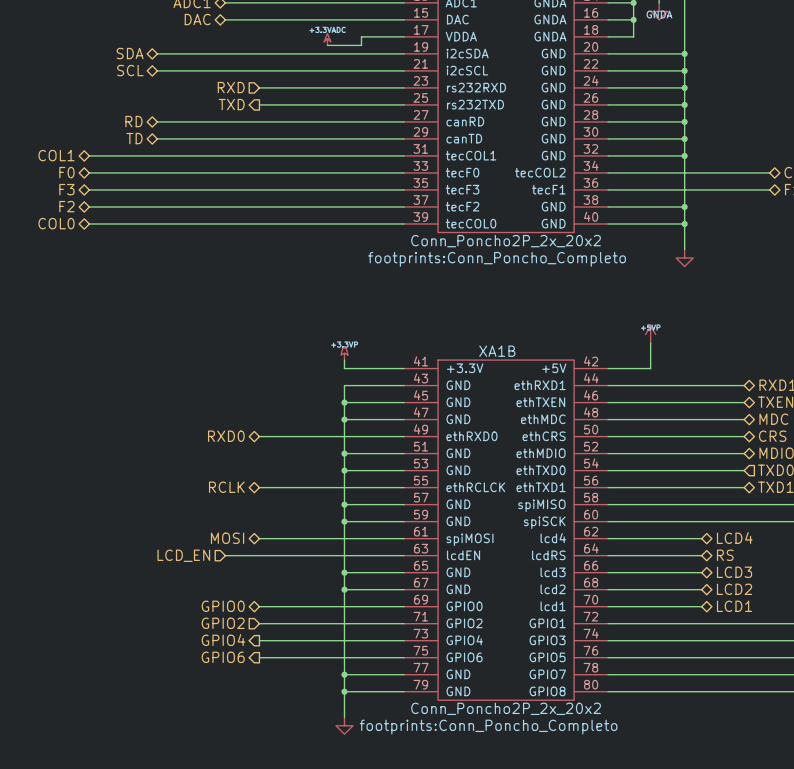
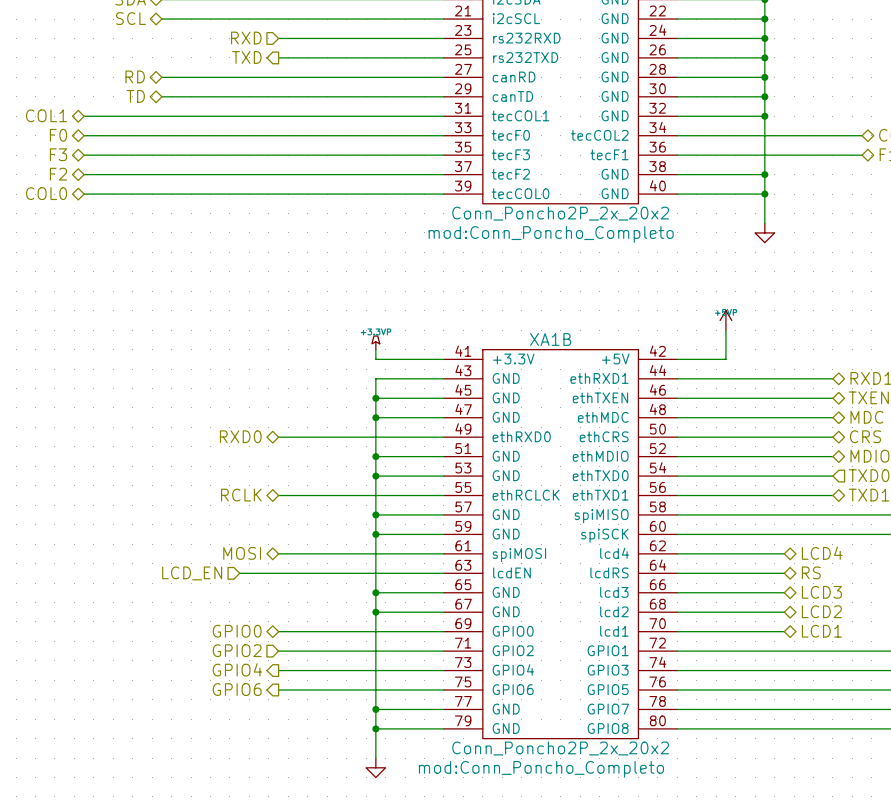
part text: footprints:Conn_Poncho_Completo (497, 259) -> mod:Conn_Poncho_Completo (551, 234)
XA1B text: footprints:Conn_Poncho_Completo (488, 727) -> mod:Conn_Poncho_Completo (541, 769)

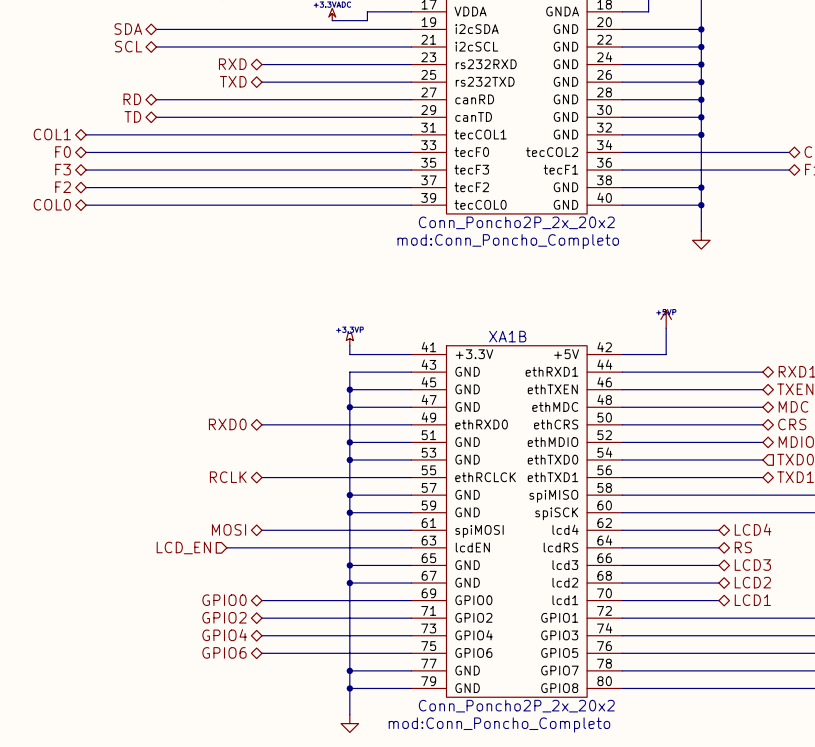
hierarchical label shape: input (246, 38) -> bidirectional (232, 64)
hierarchical label shape: output (246, 57) -> bidirectional (233, 81)
hierarchical label shape: input (237, 650) -> bidirectional (224, 617)
hierarchical label shape: output (237, 669) -> bidirectional (224, 635)
hierarchical label shape: output (237, 689) -> bidirectional (224, 652)

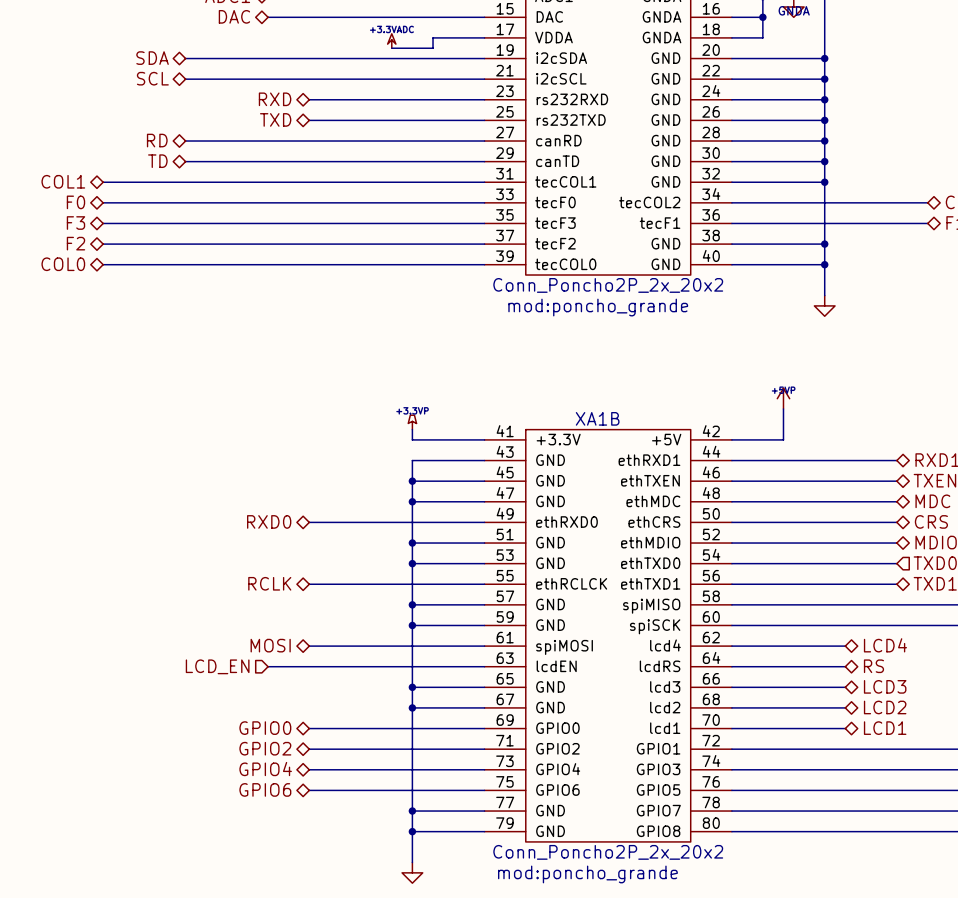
part text: mod:Conn_Poncho_Completo (508, 241) -> mod:poncho_grande (598, 307)
XA1B text: mod:Conn_Poncho_Completo (499, 724) -> mod:poncho_grande (587, 874)

